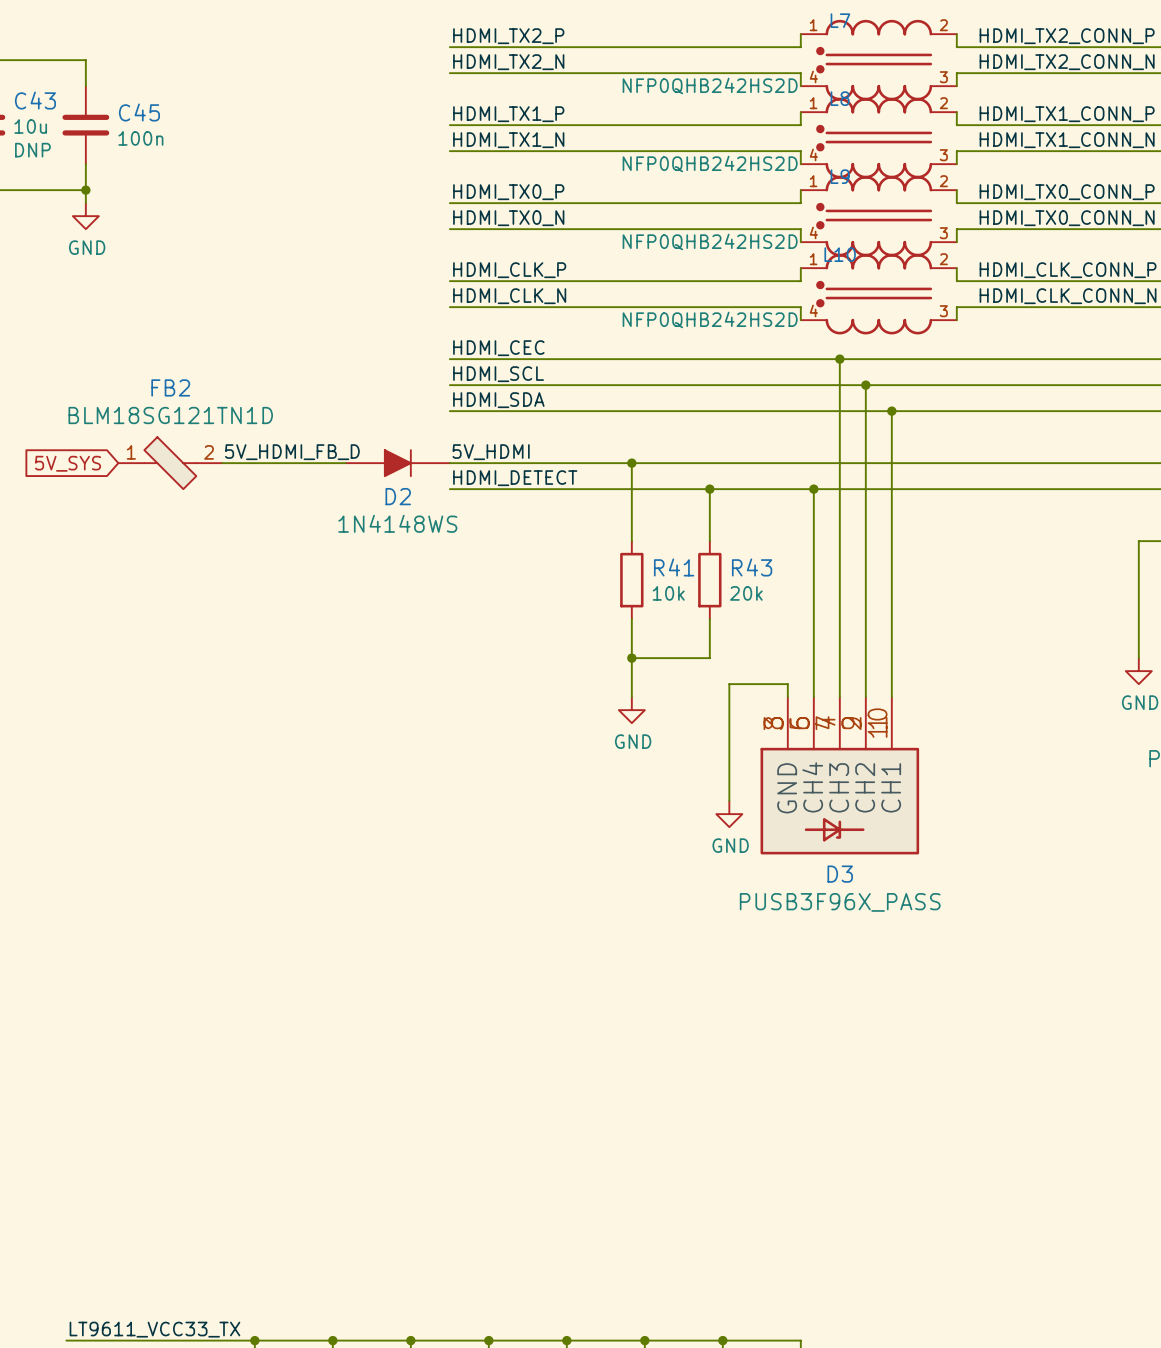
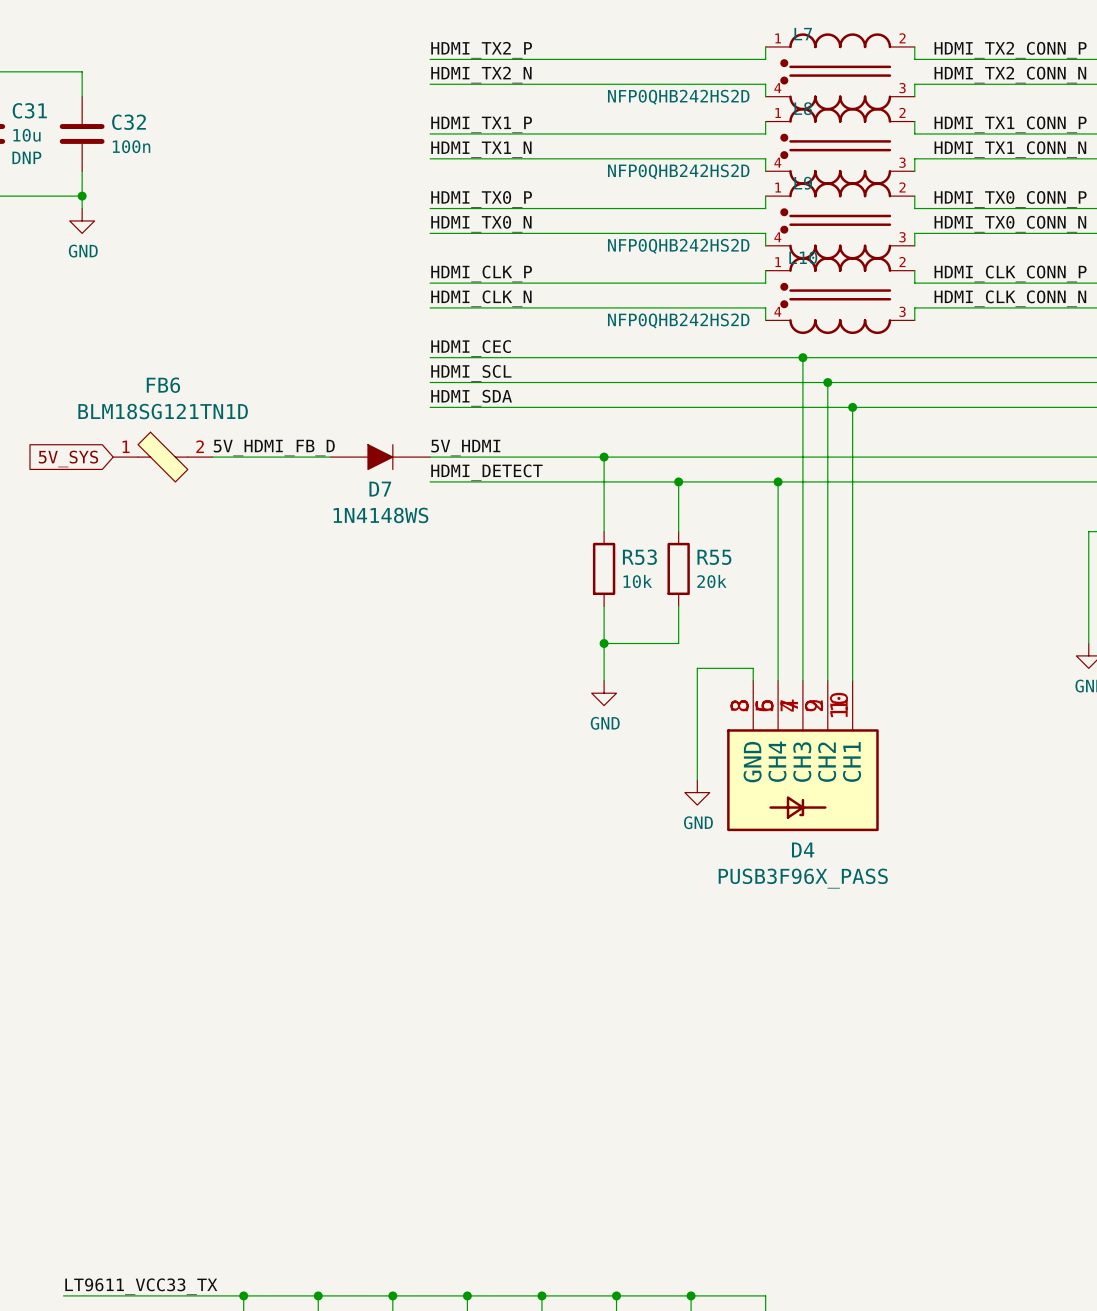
C43 name: C43 (35, 100) -> C31 (29, 110)
C45 name: C45 (139, 112) -> C32 (129, 122)
FB2 name: FB2 (170, 387) -> FB6 (163, 385)
D2 name: D2 (398, 496) -> D7 (380, 489)
R41 name: R41 (674, 567) -> R53 (639, 557)
R43 name: R43 (752, 567) -> R55 (714, 557)
D3 name: D3 (840, 874) -> D4 (803, 849)

